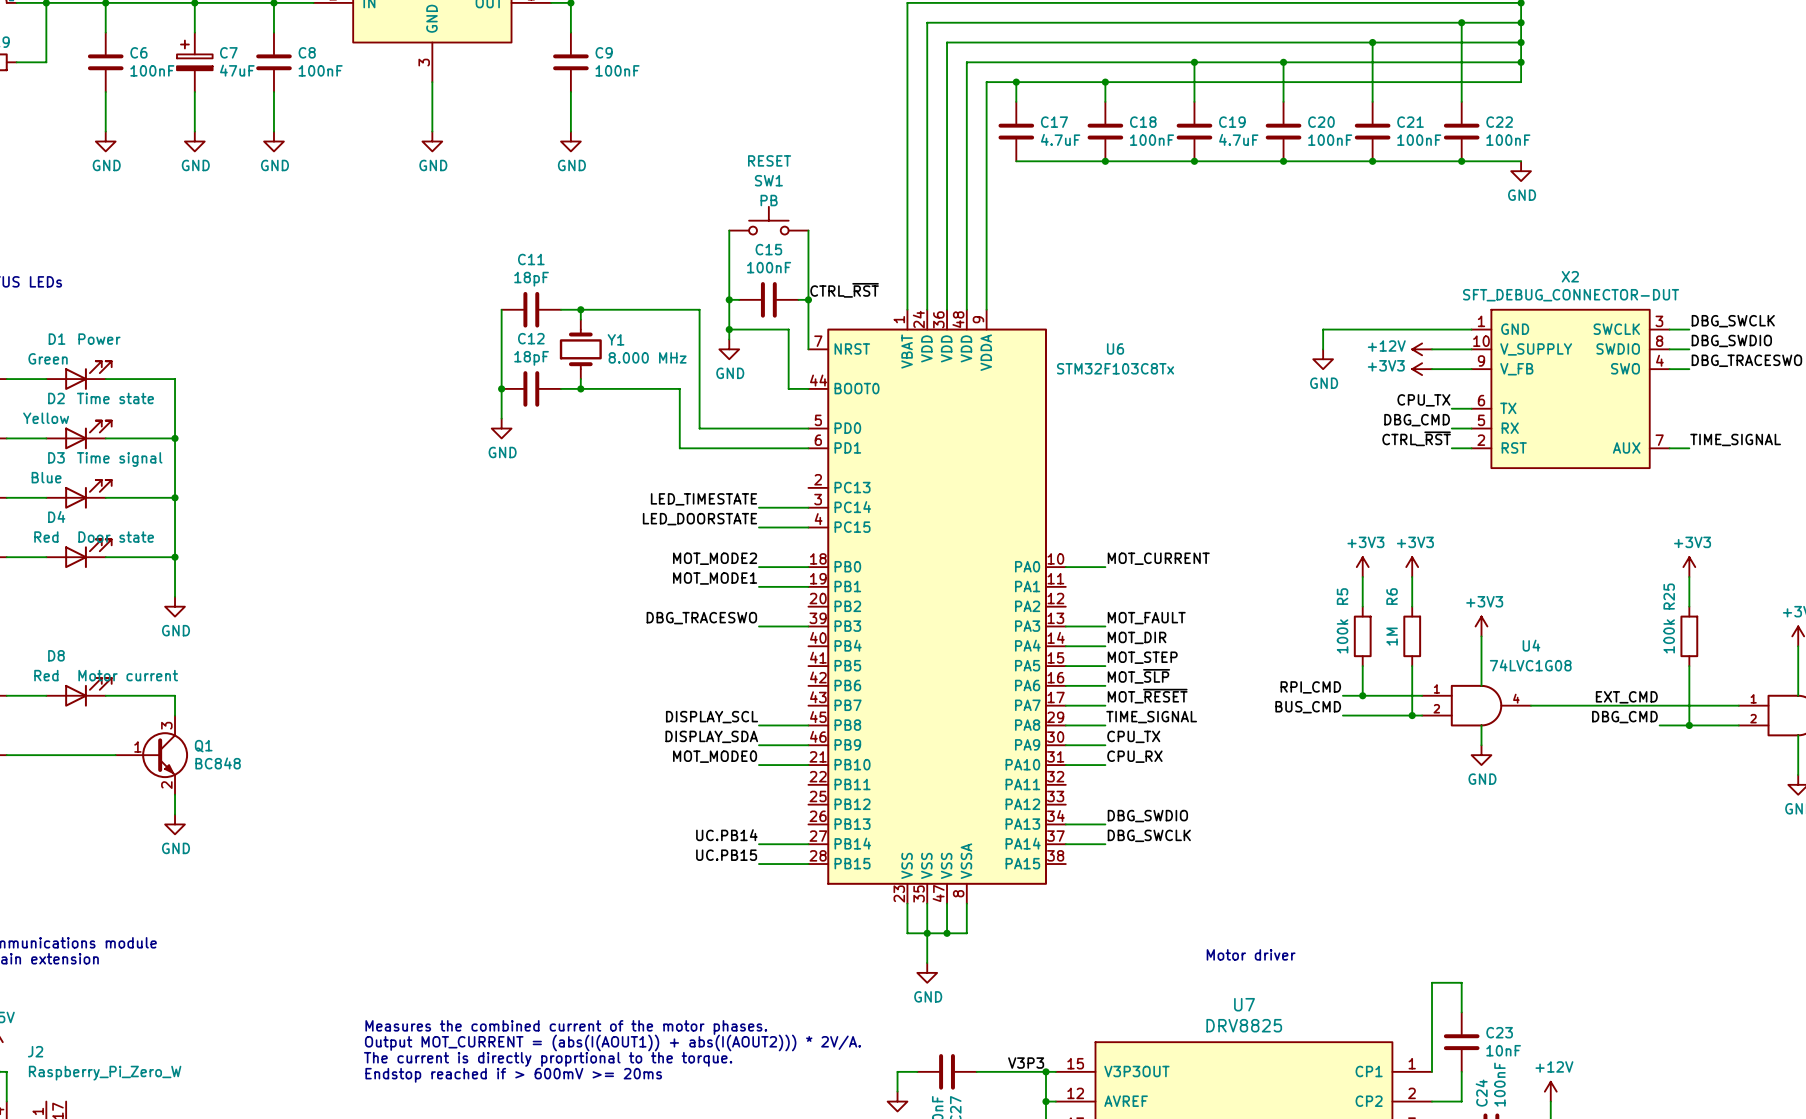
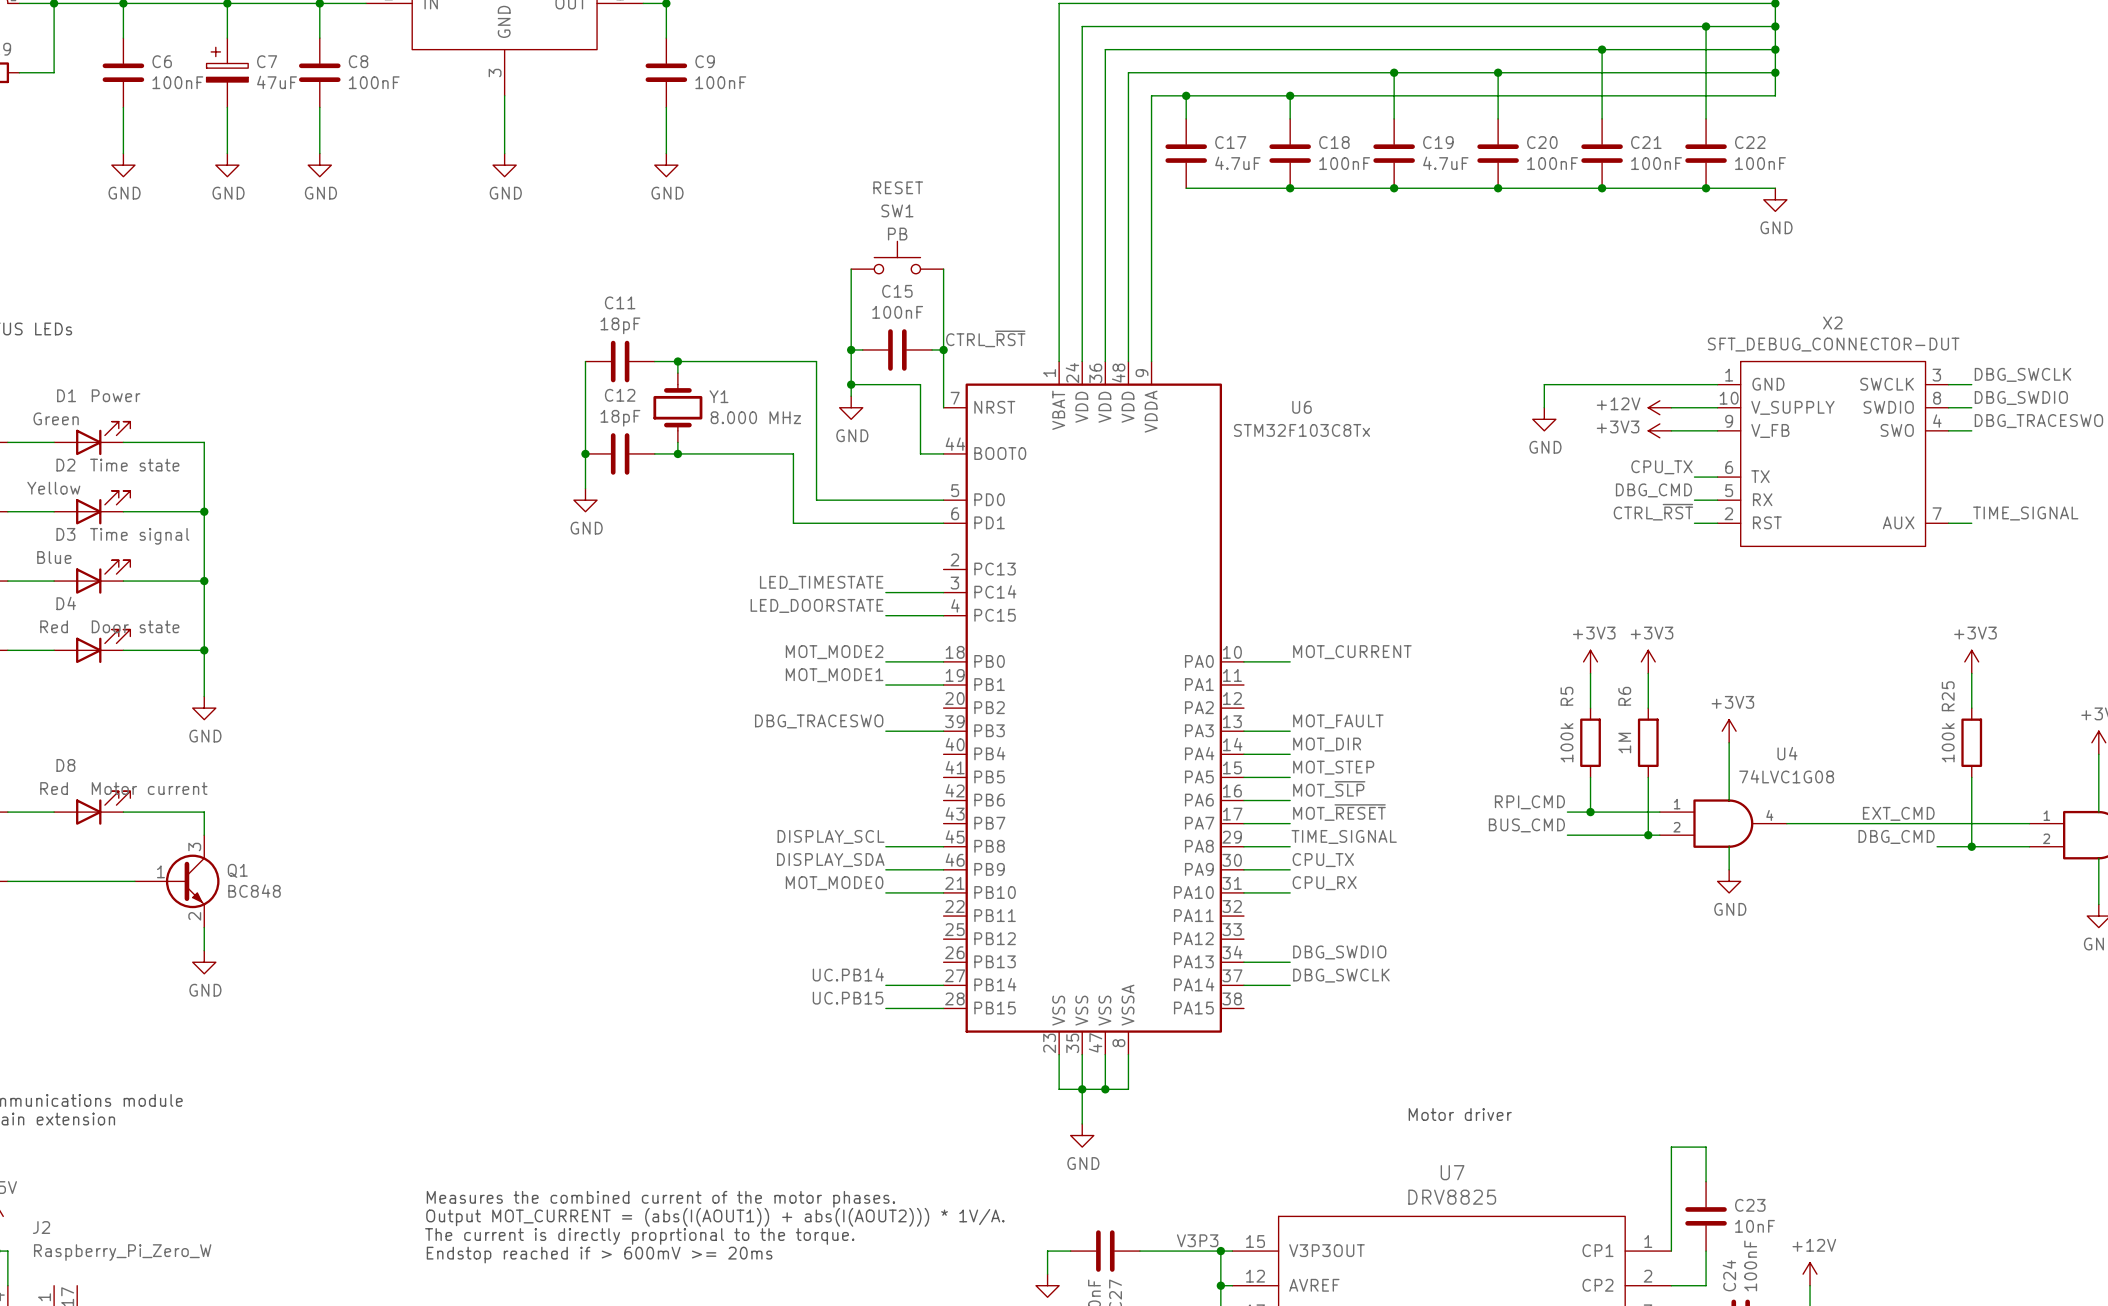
text: Output MOT_CURRENT = (abs(I(AOUT1)) + abs(I(AOUT2))) * 2V/A. (612, 1042) -> Output MOT_CURRENT = (abs(I(AOUT1)) + abs(I(AOUT2))) * 1V/A. (715, 1217)

